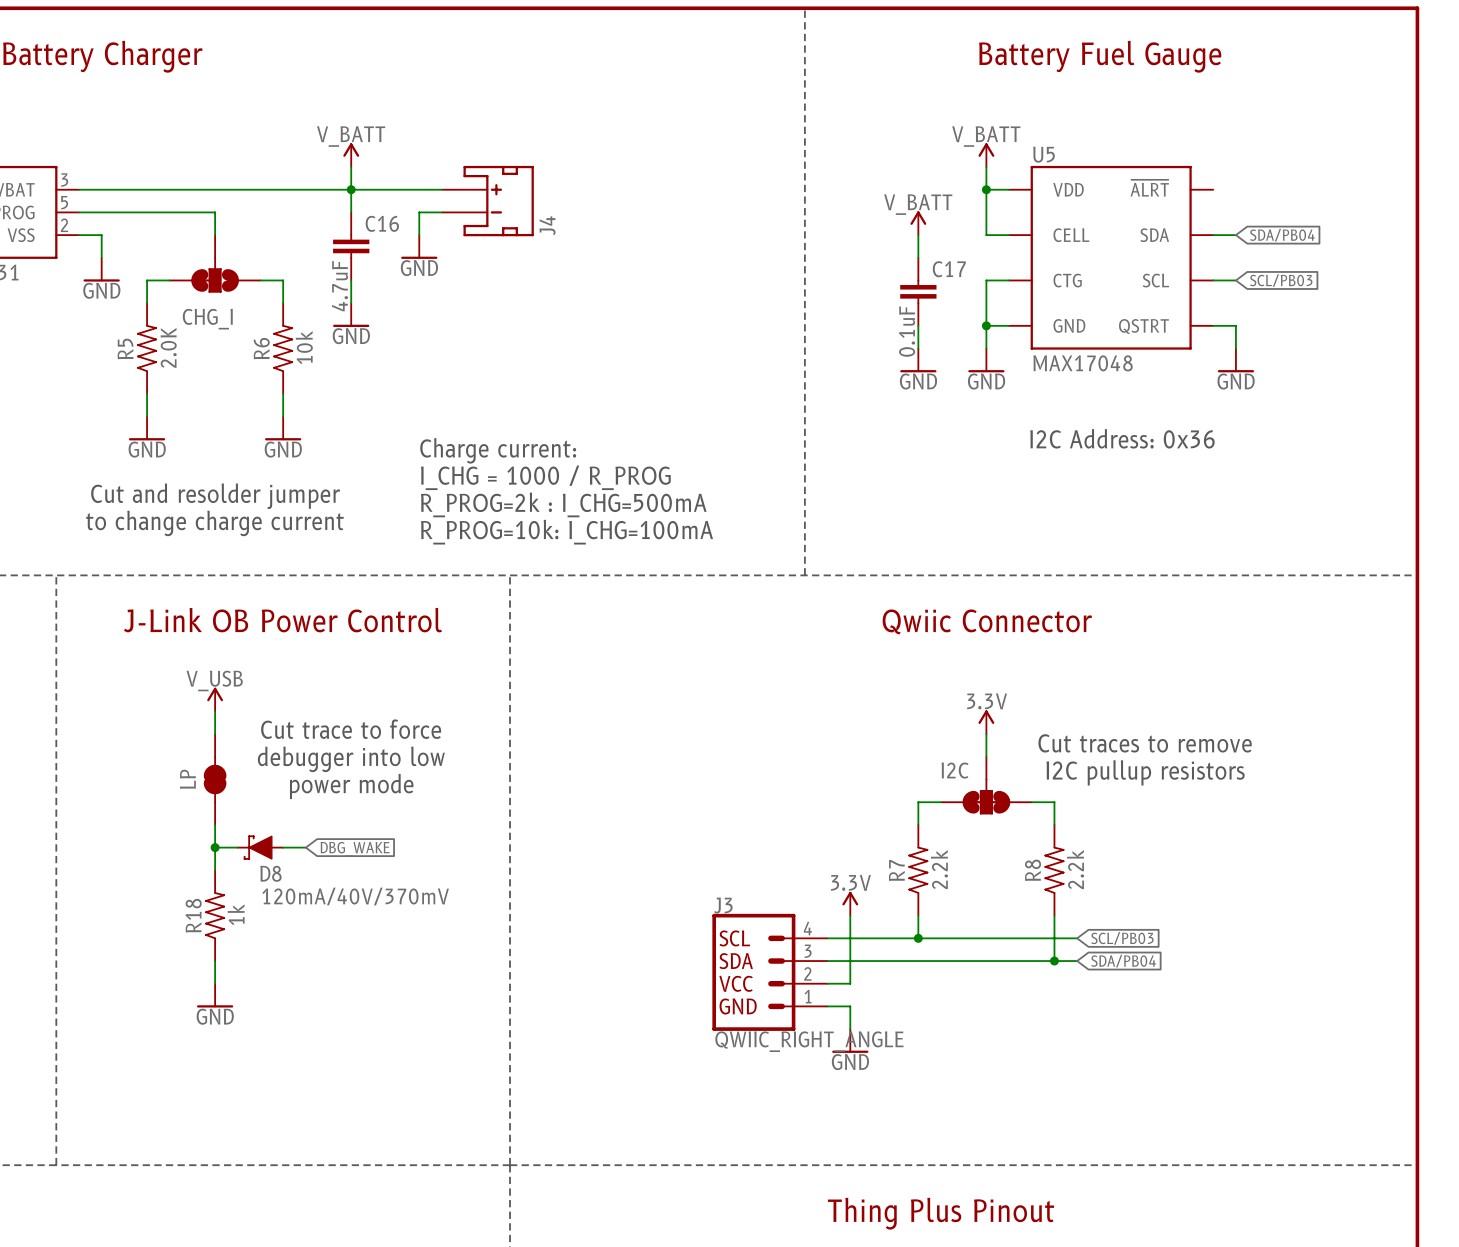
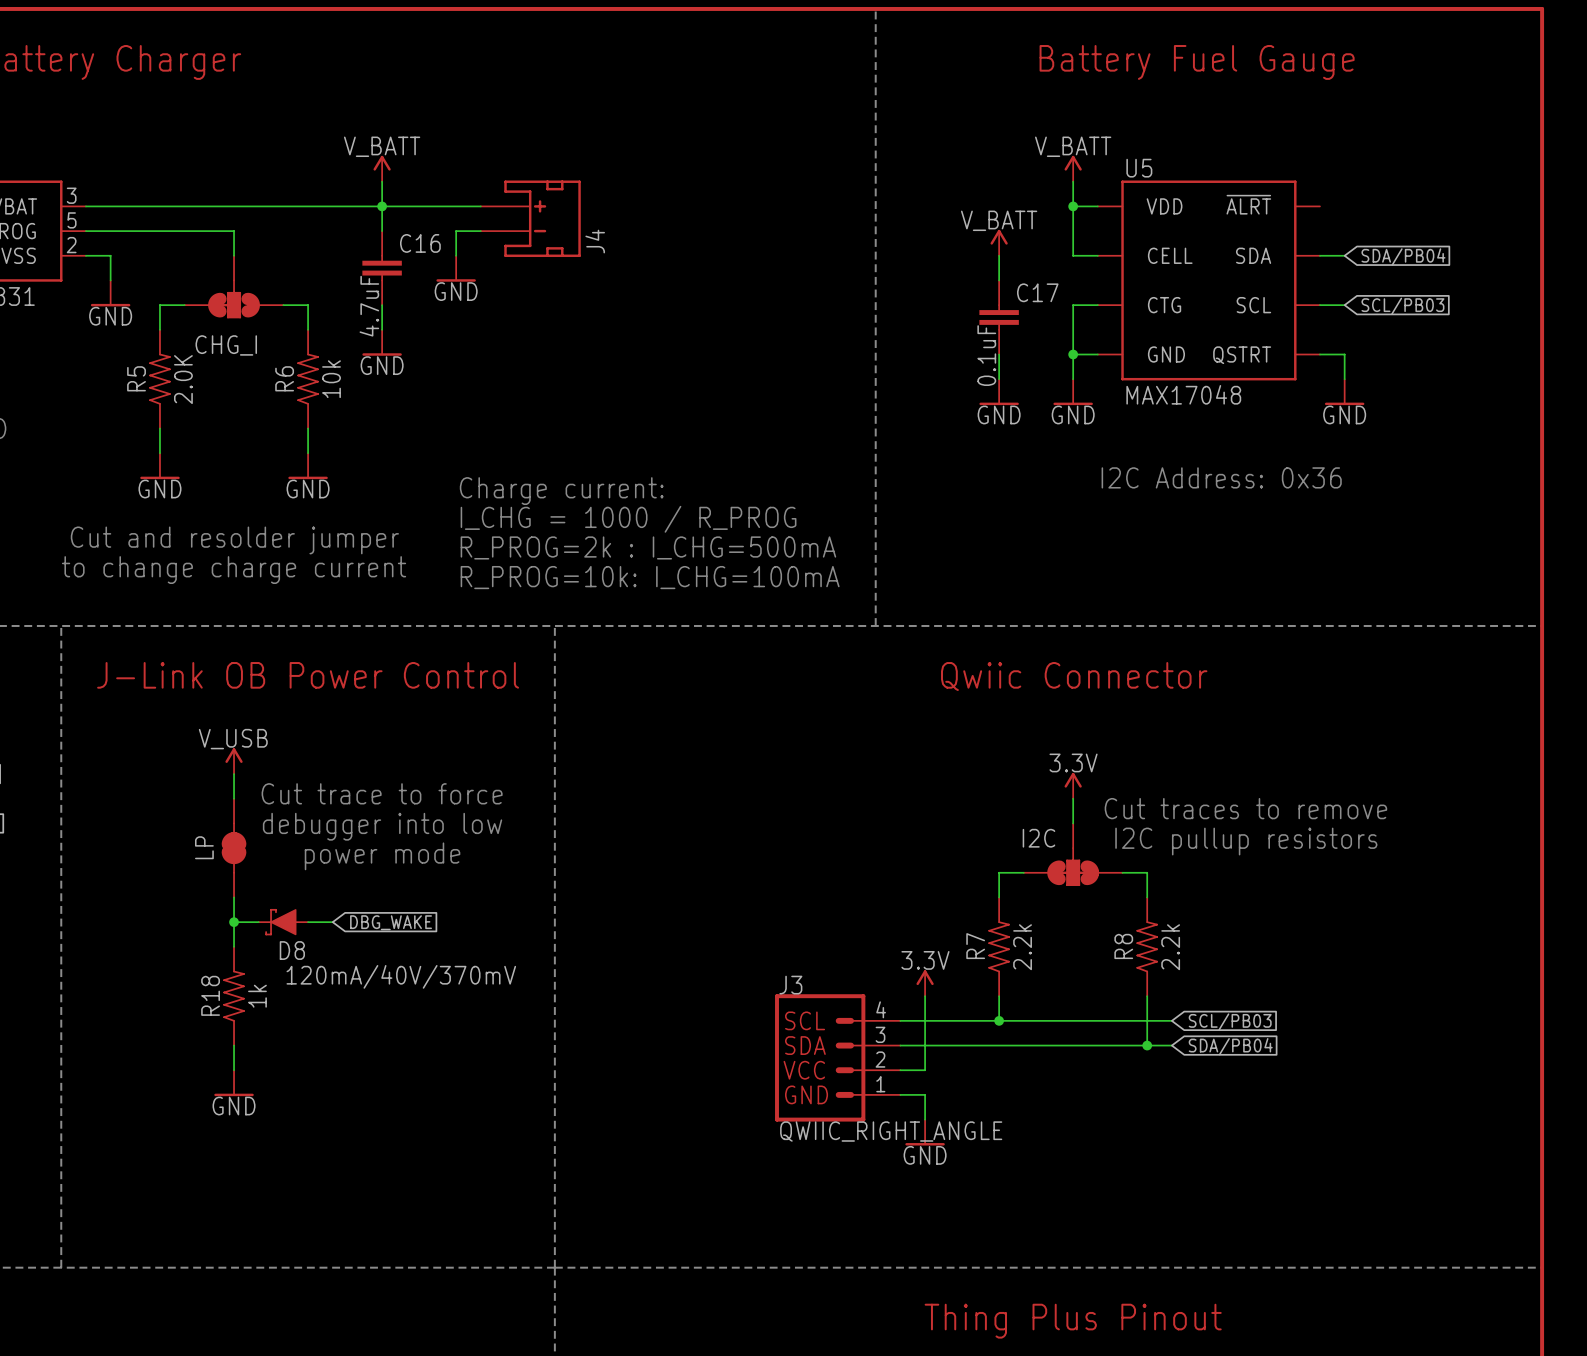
text position: Thing Plus Pinout (941, 1213) -> Thing Plus Pinout (1073, 1321)

